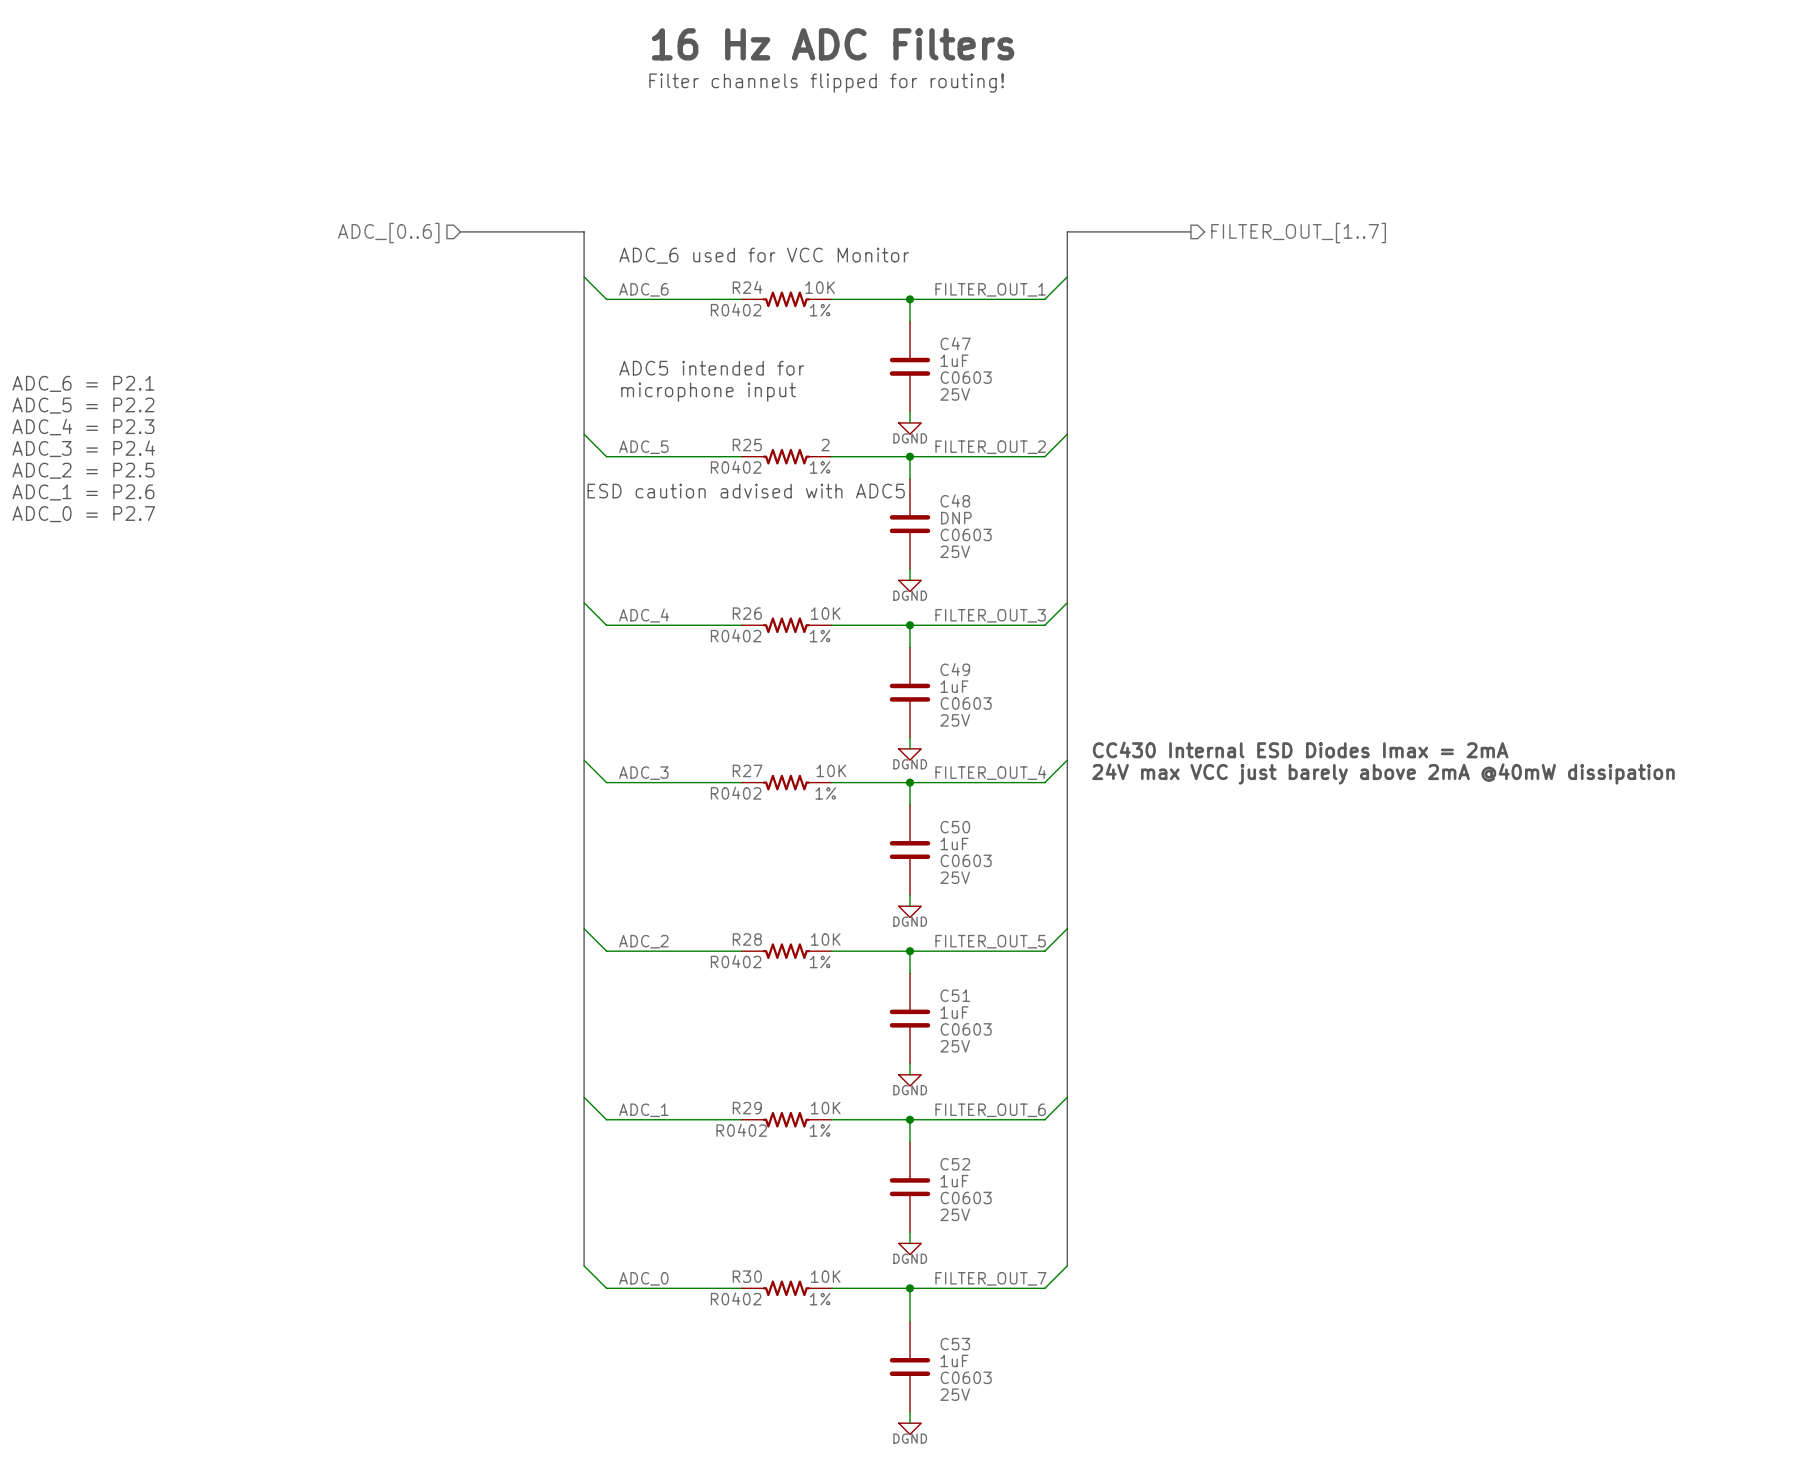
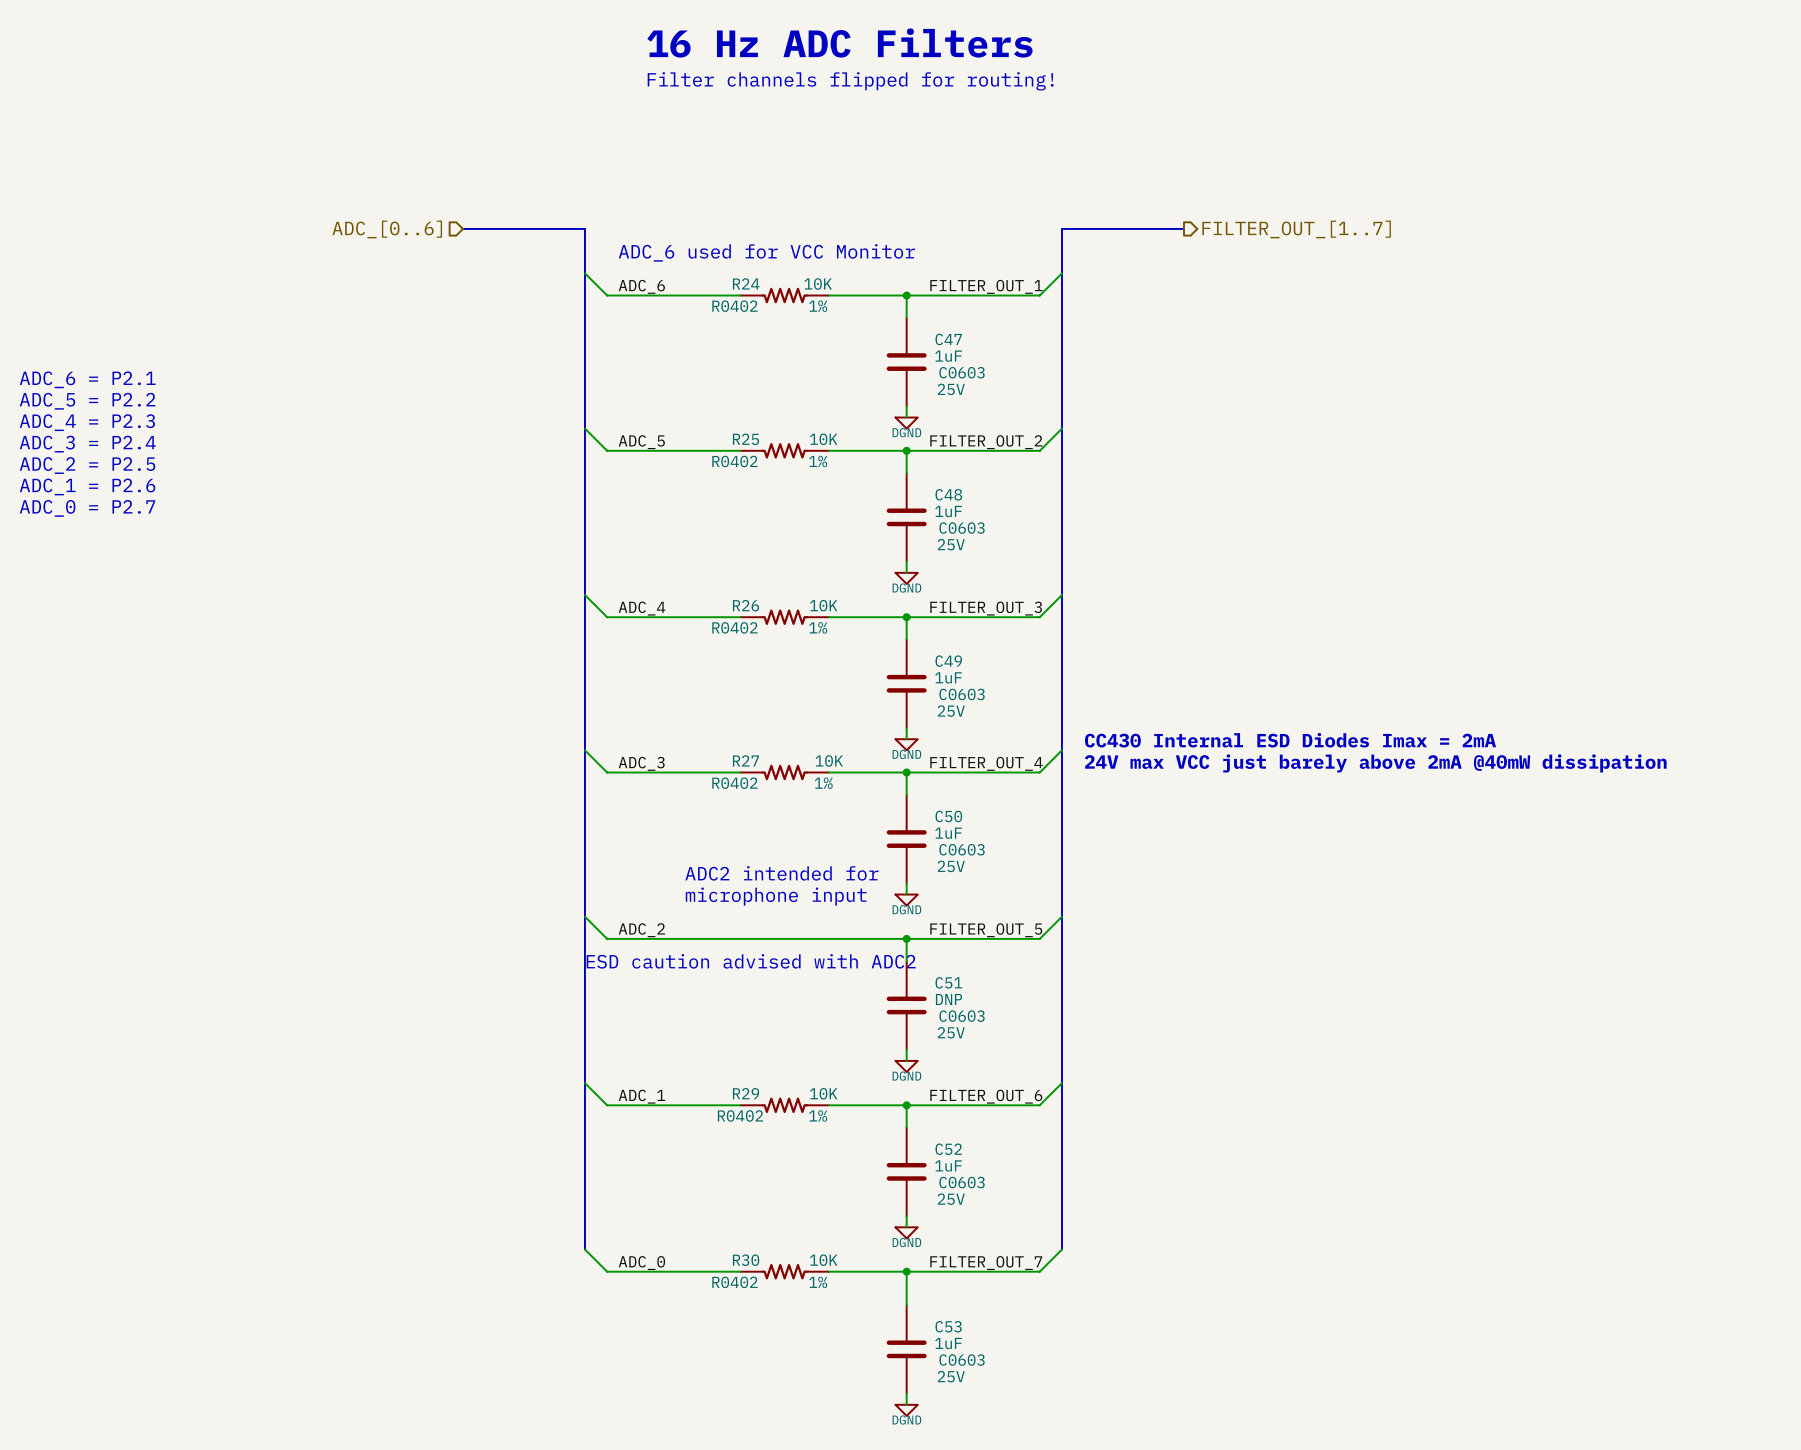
text: ADC5 intended for (711, 368) -> none
text: microphone input (708, 392) -> none
R25 value: 2 (825, 445) -> 10K (823, 439)
text: ESD caution advised with ADC5 (746, 491) -> none
C48 value: DNP (956, 518) -> 1uF (948, 511)
text: none -> ADC2 intended for (781, 873)
text: none -> microphone input (776, 896)
R28: 10K (786, 951) -> none
text: none -> ESD caution advised with ADC2 (751, 961)
C51 value: 1uF (954, 1012) -> DNP (949, 999)

